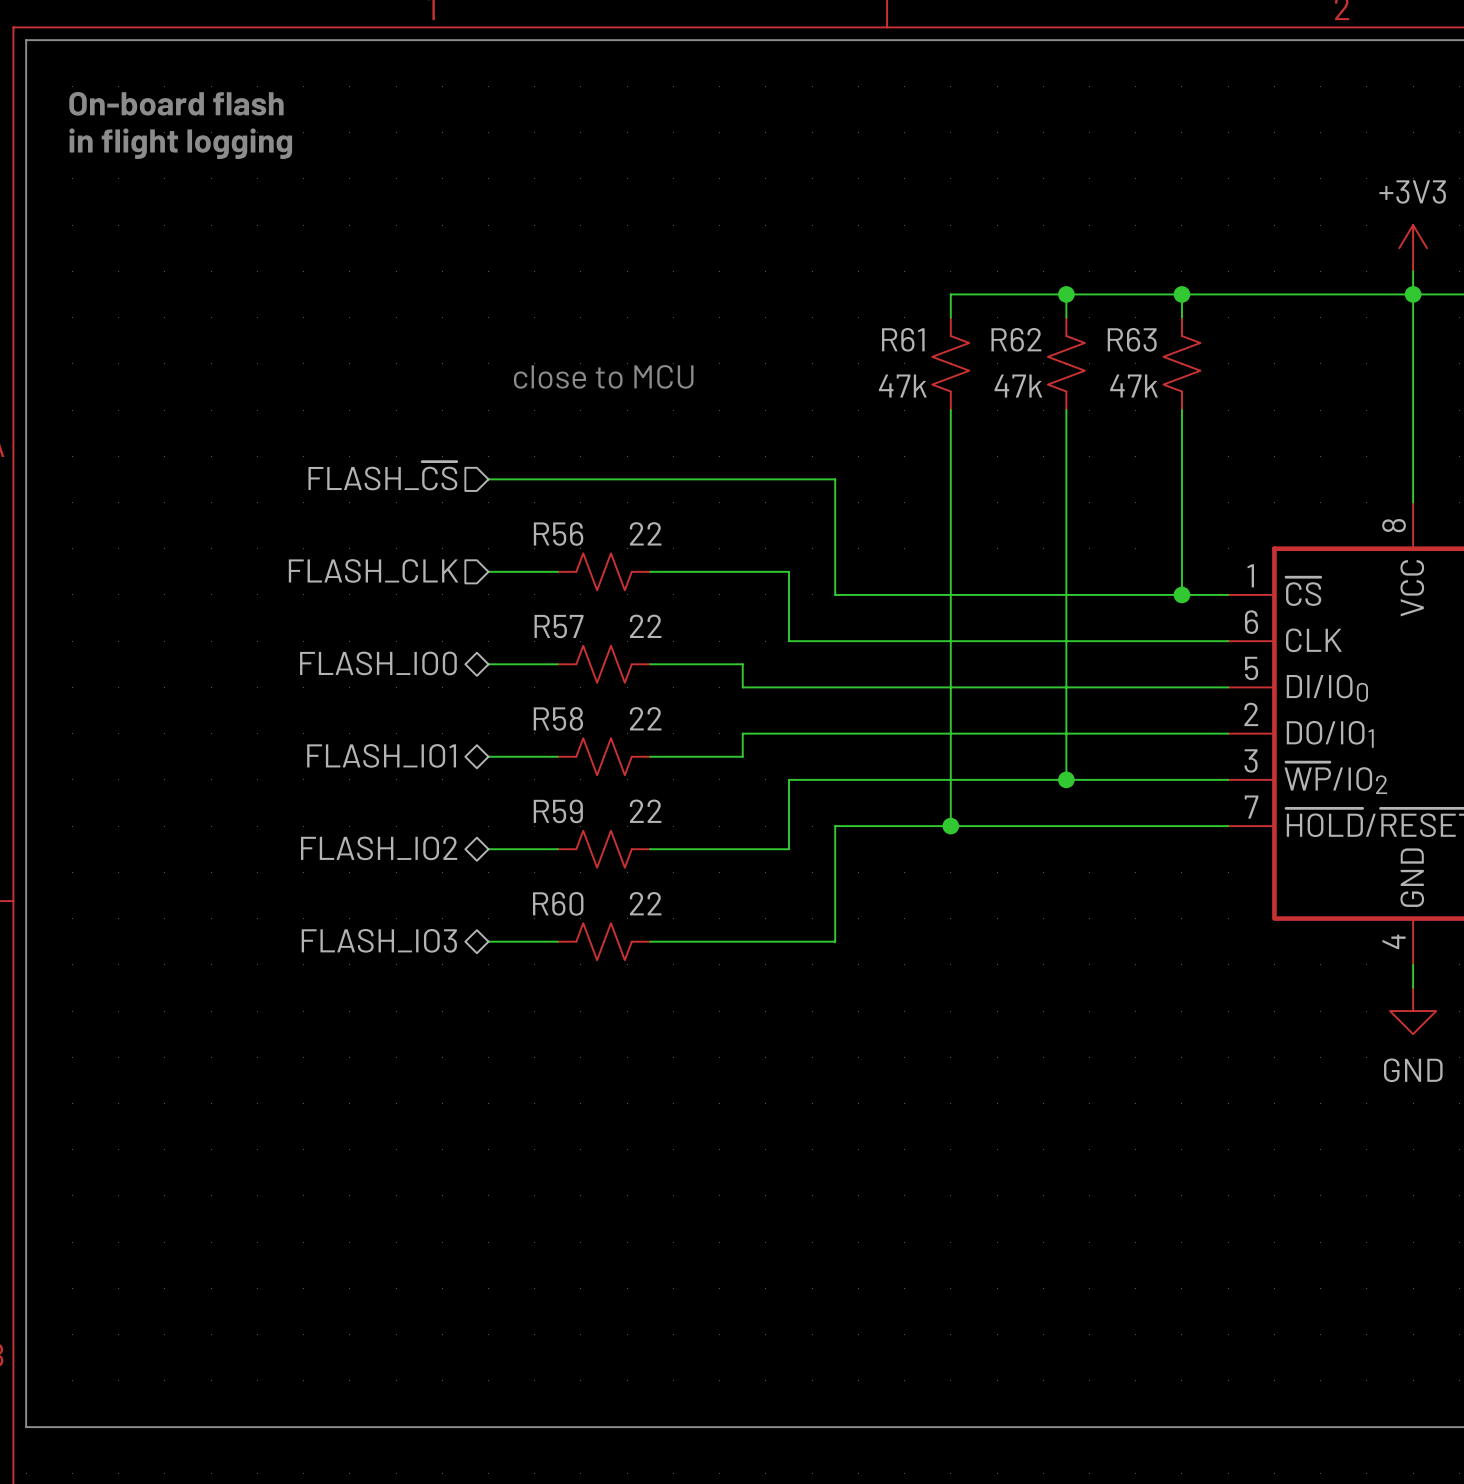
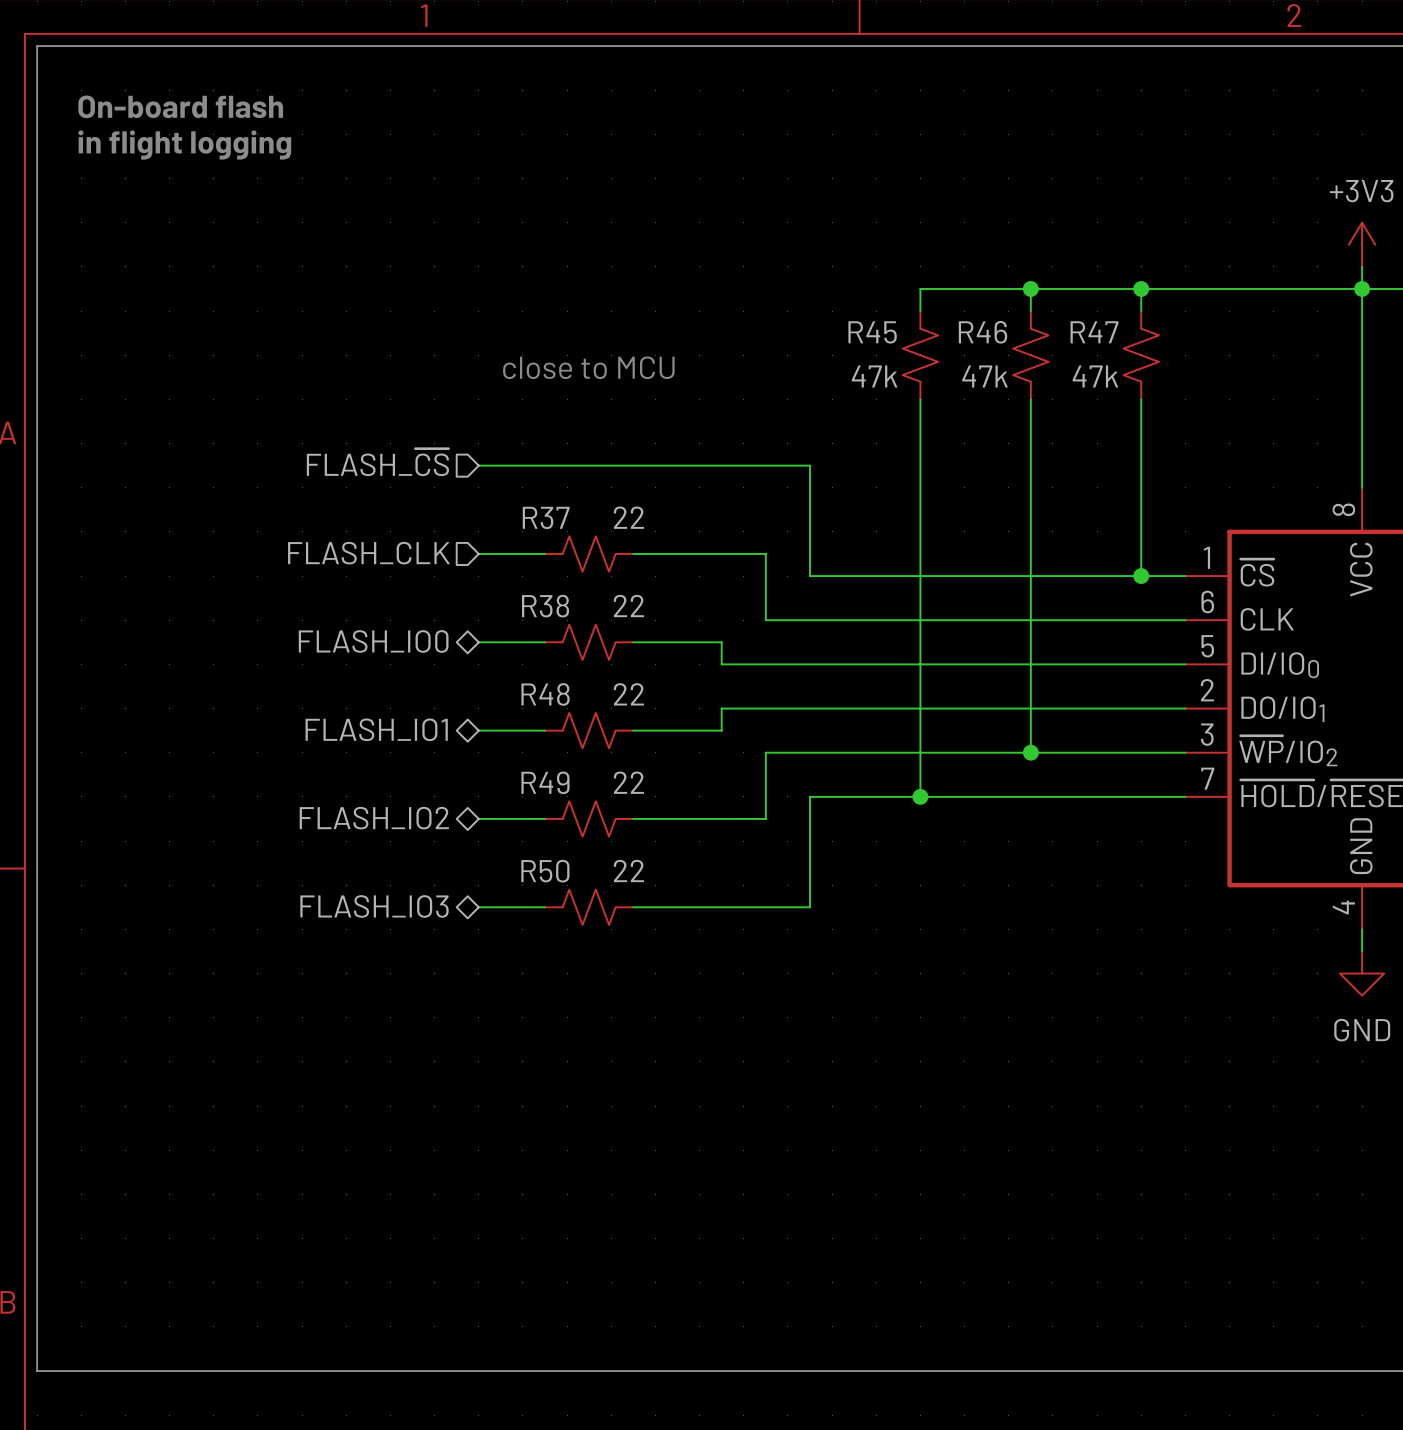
R61 name: R61 (903, 339) -> R45 (872, 332)
R62 name: R62 (1016, 339) -> R46 (982, 332)
R63 name: R63 (1132, 339) -> R47 (1094, 332)
R56 name: R56 (558, 533) -> R37 (546, 517)
R57 name: R57 (559, 626) -> R38 (545, 606)
R58 name: R58 (558, 718) -> R48 (545, 694)
R59 name: R59 (558, 811) -> R49 (545, 782)
R60 name: R60 (558, 903) -> R50 (545, 871)

